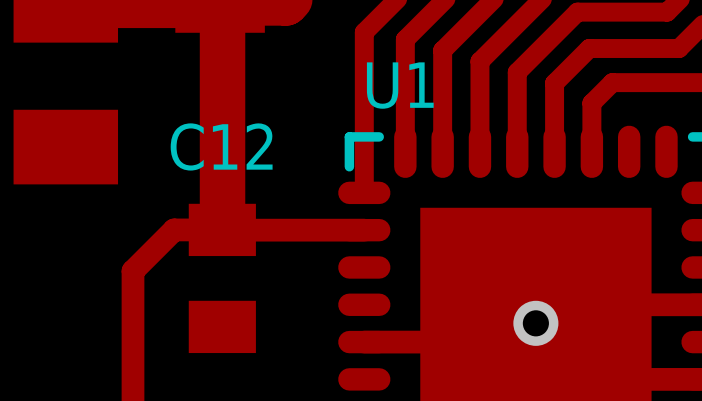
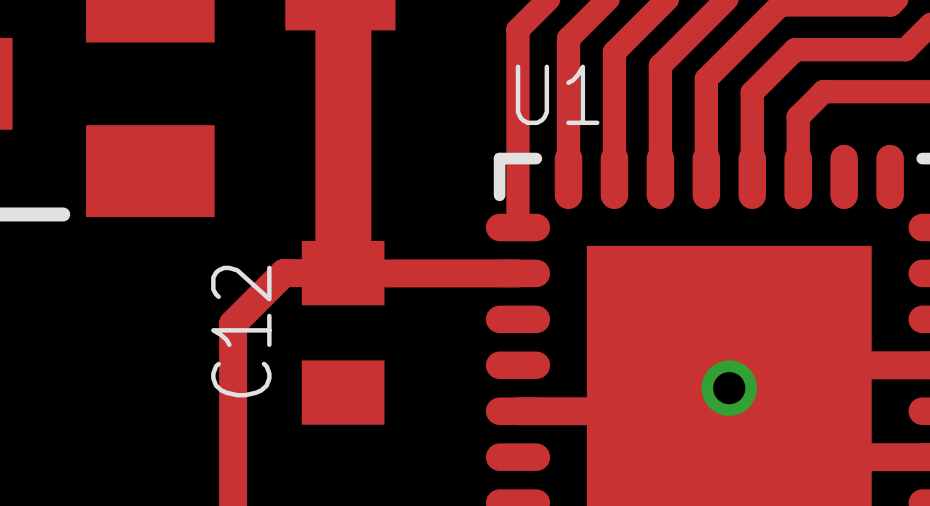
C12 name rotation: 0° (221, 146) -> 90° counterclockwise (241, 331)
C12 name position: C12 (221, 146) -> C12 (241, 331)

